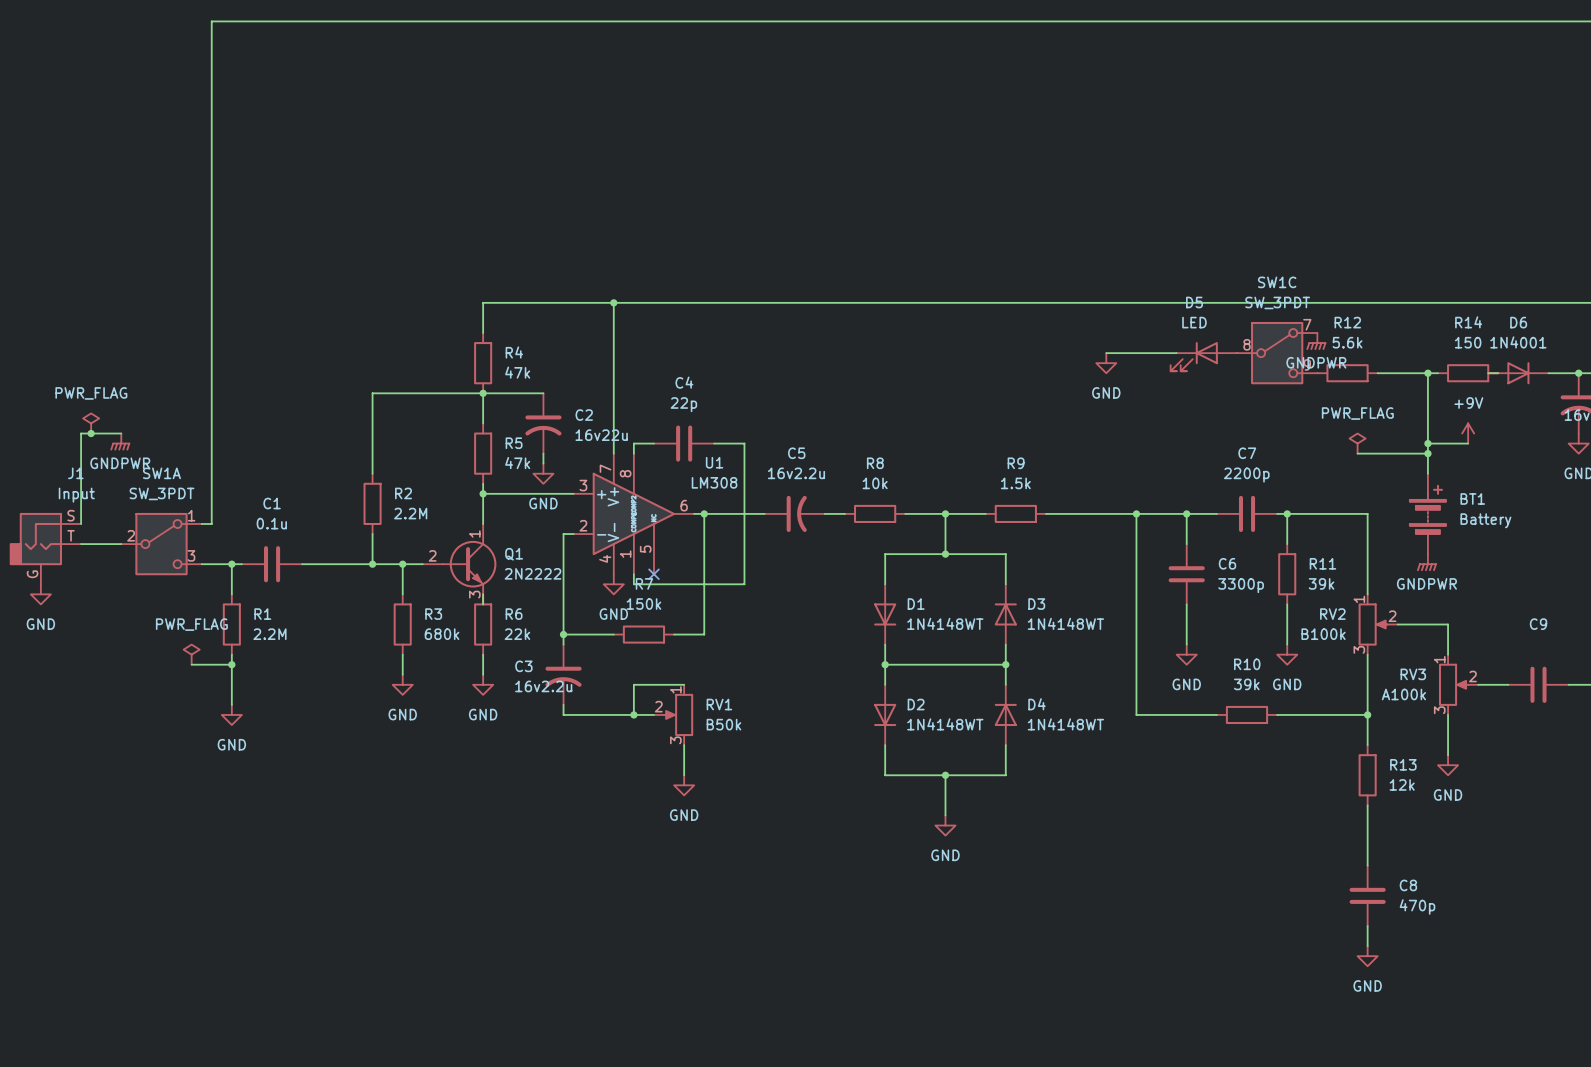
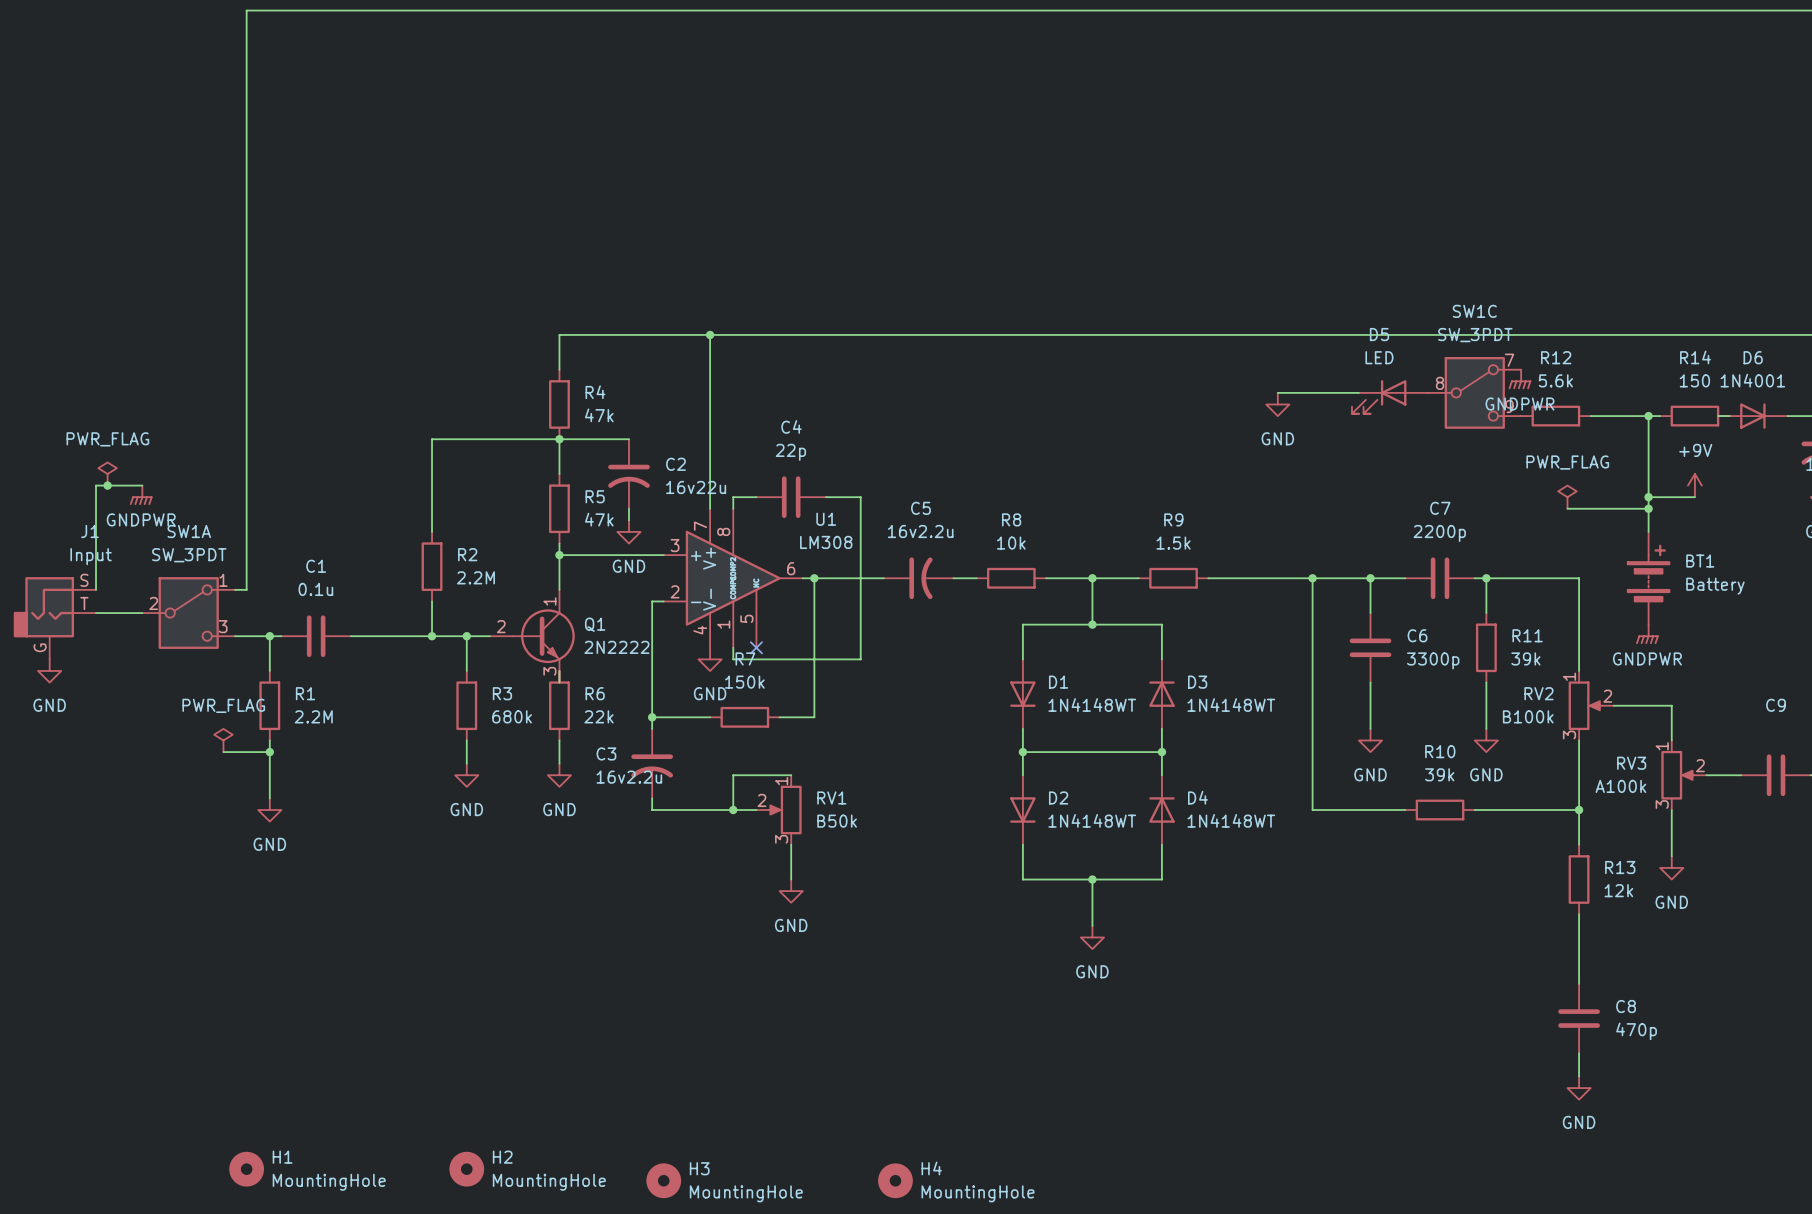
H1: none -> MountingHole (246, 1169)
H2: none -> MountingHole (466, 1169)
H3: none -> MountingHole (663, 1180)
H4: none -> MountingHole (895, 1180)

